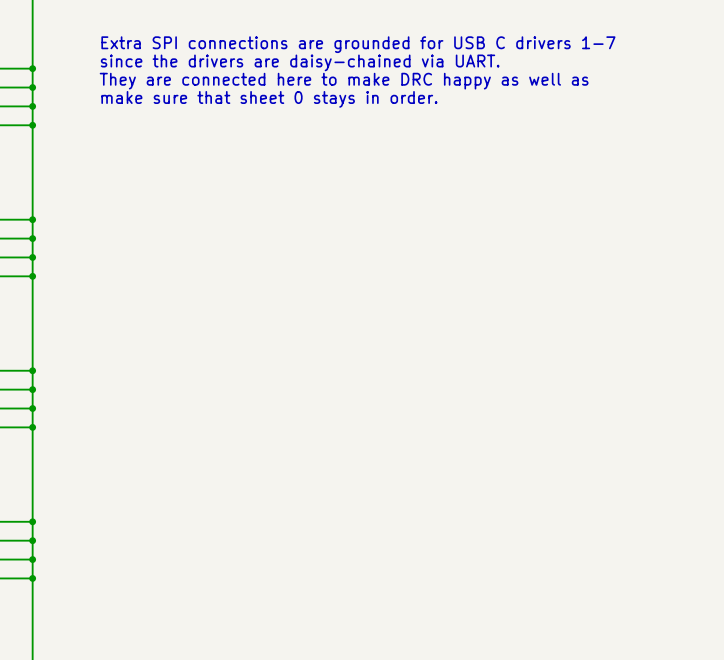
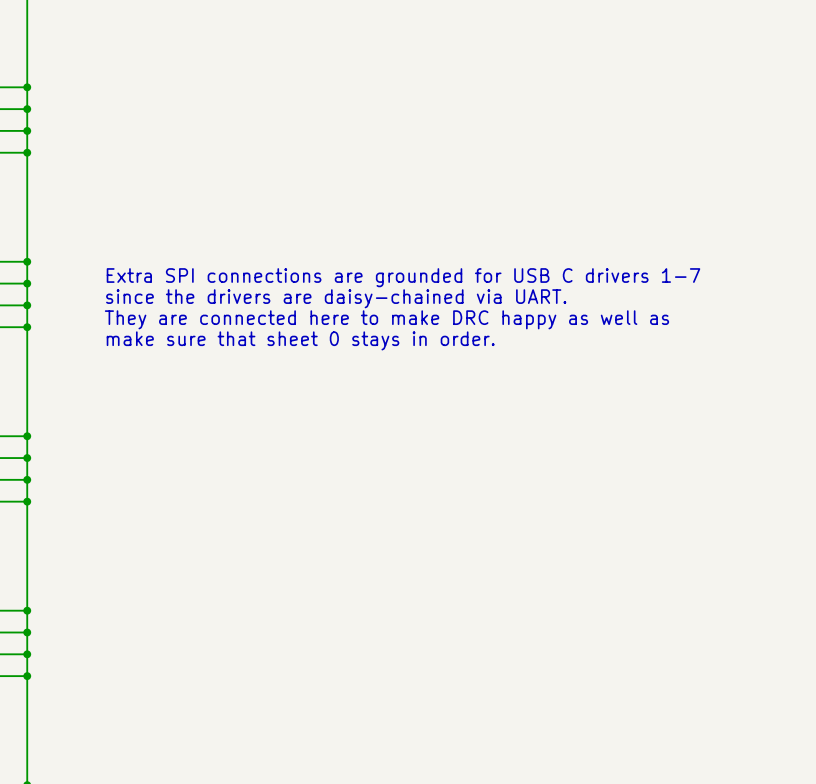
text: Extra SPI connections are grounded for USB C drivers 1-7 (358, 44) -> none
text: since the drivers are daisy-chained via UART. (300, 62) -> none
text: They are connected here to make DRC happy as well as (344, 81) -> none
text: make sure that sheet 0 stays in order. (269, 99) -> none
text: none -> Extra SPI connections are grounded for USB C drivers 1-7 (403, 277)
text: none -> since the drivers are daisy-chained via UART. (336, 298)
text: none -> They are connected here to make DRC happy as well as (386, 319)
text: none -> make sure that sheet 0 stays in order. (300, 340)

